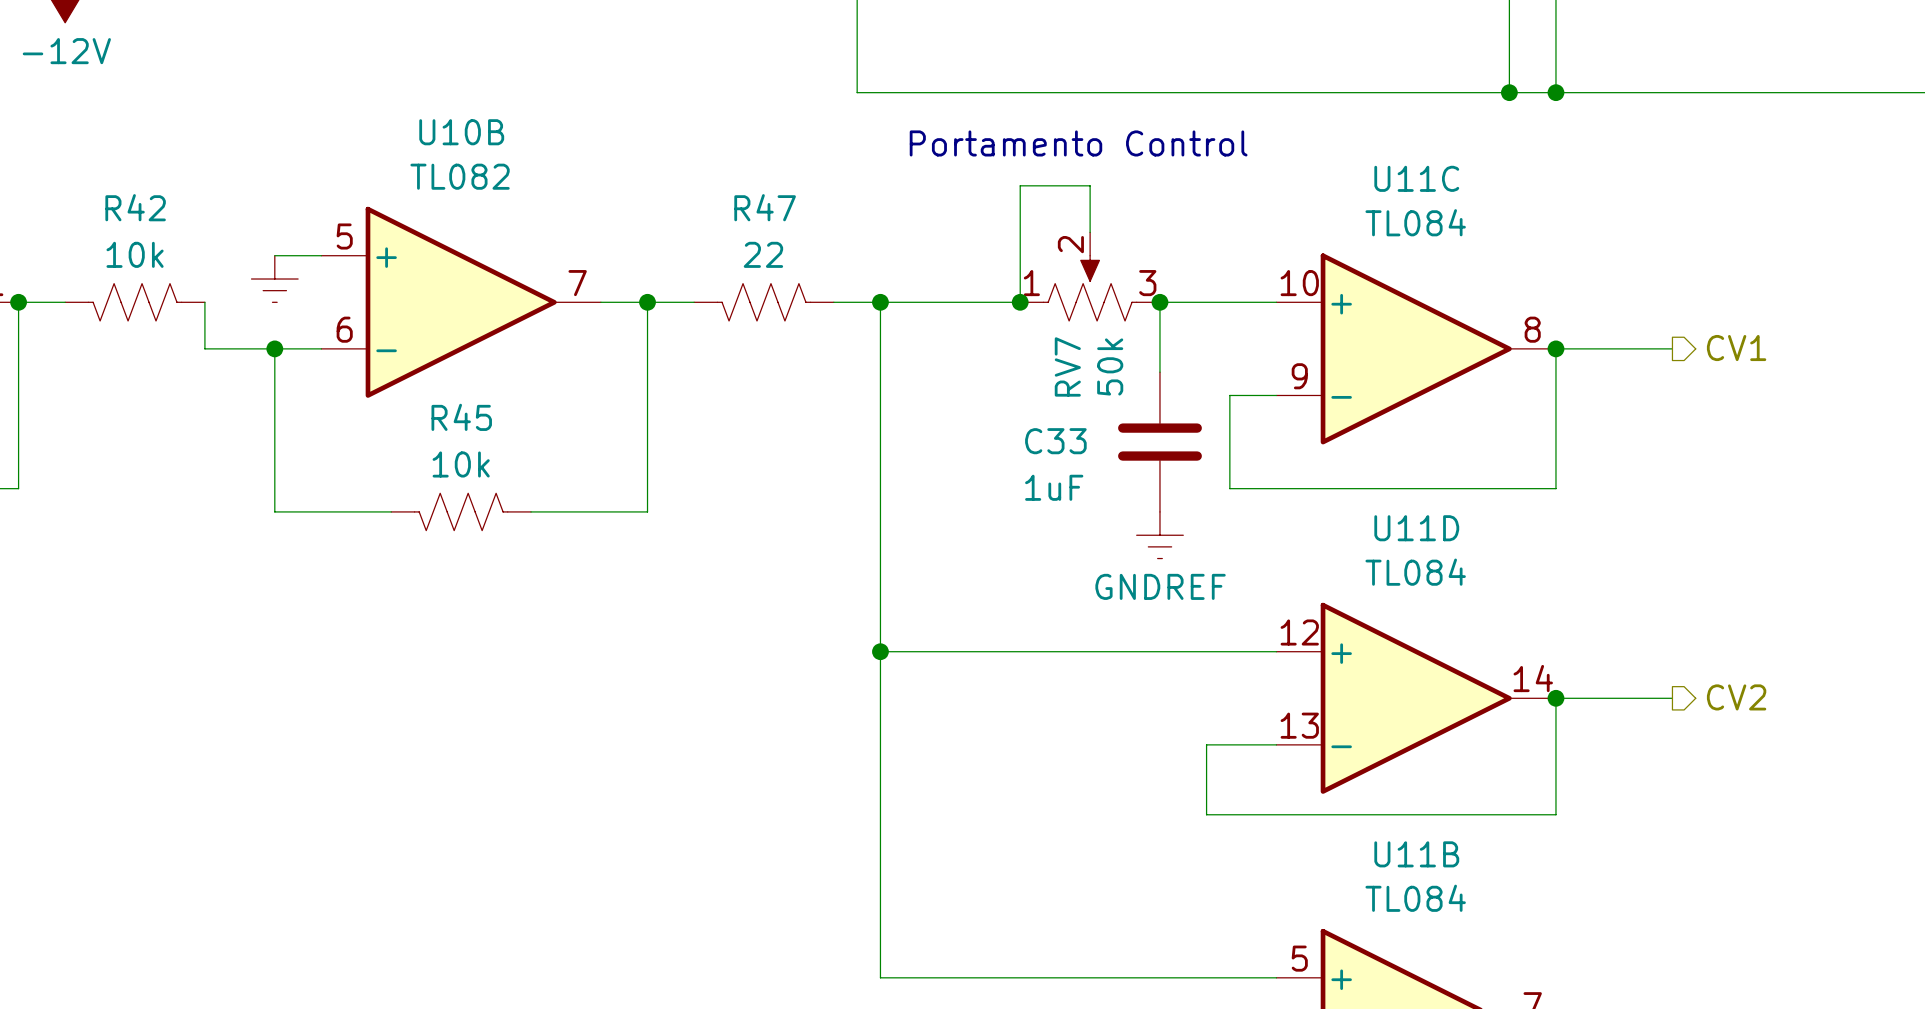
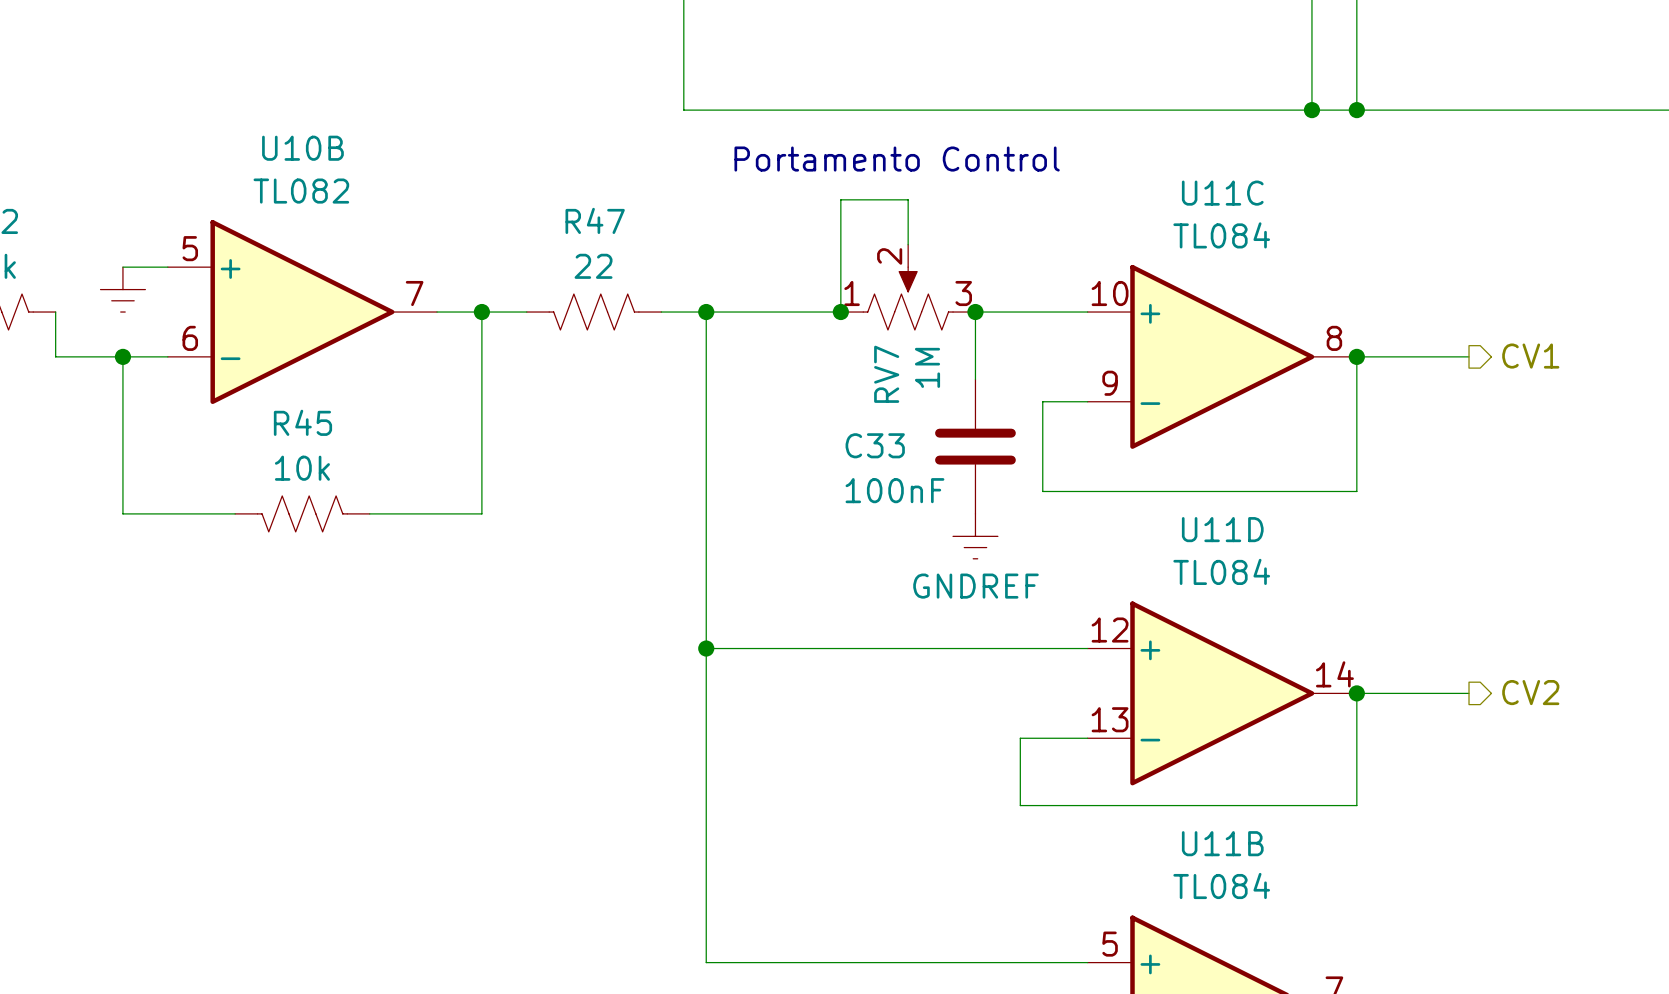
RV7 value: 50k (1110, 366) -> 1M (927, 367)
C33 value: 1uF (1054, 487) -> 100nF (894, 490)

